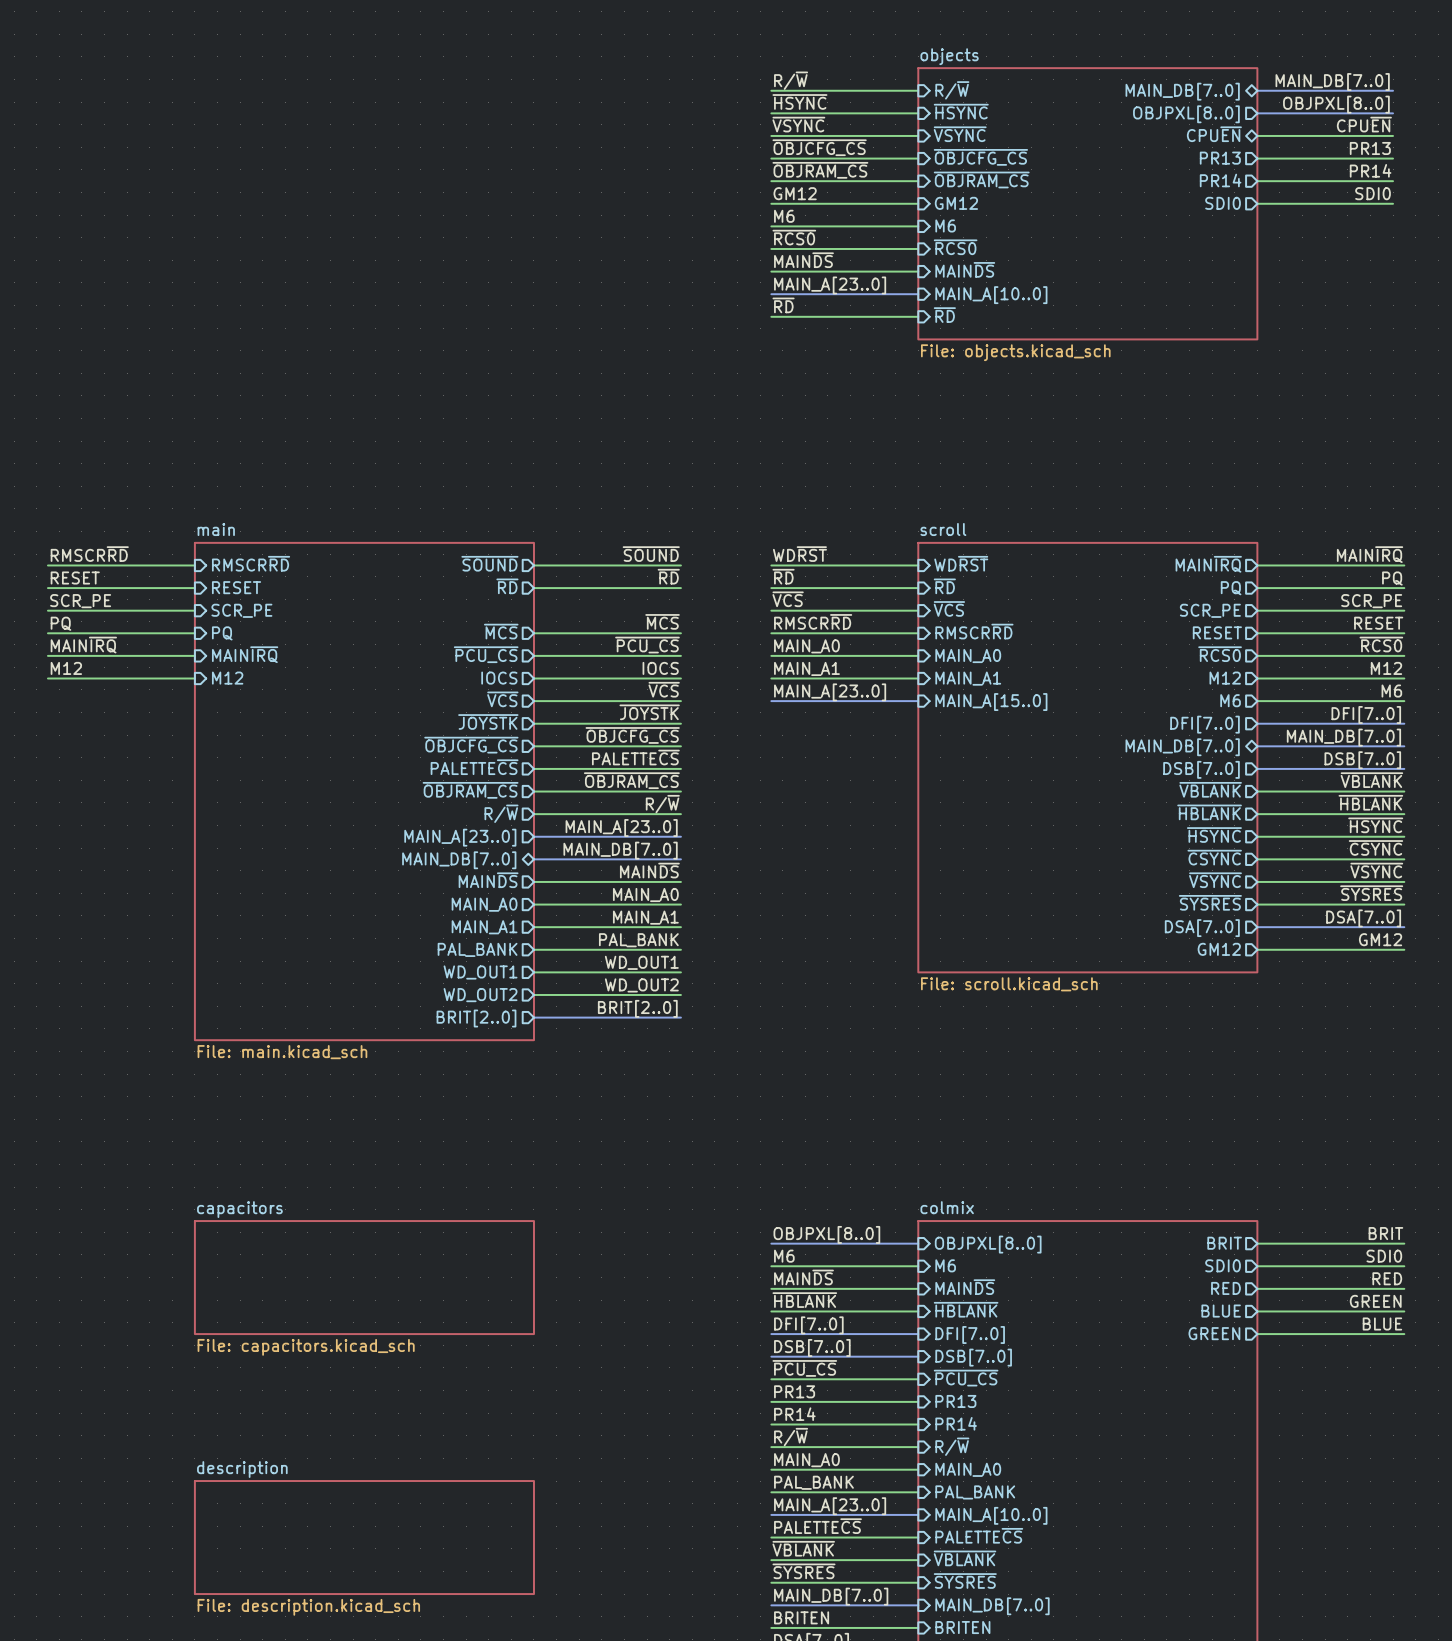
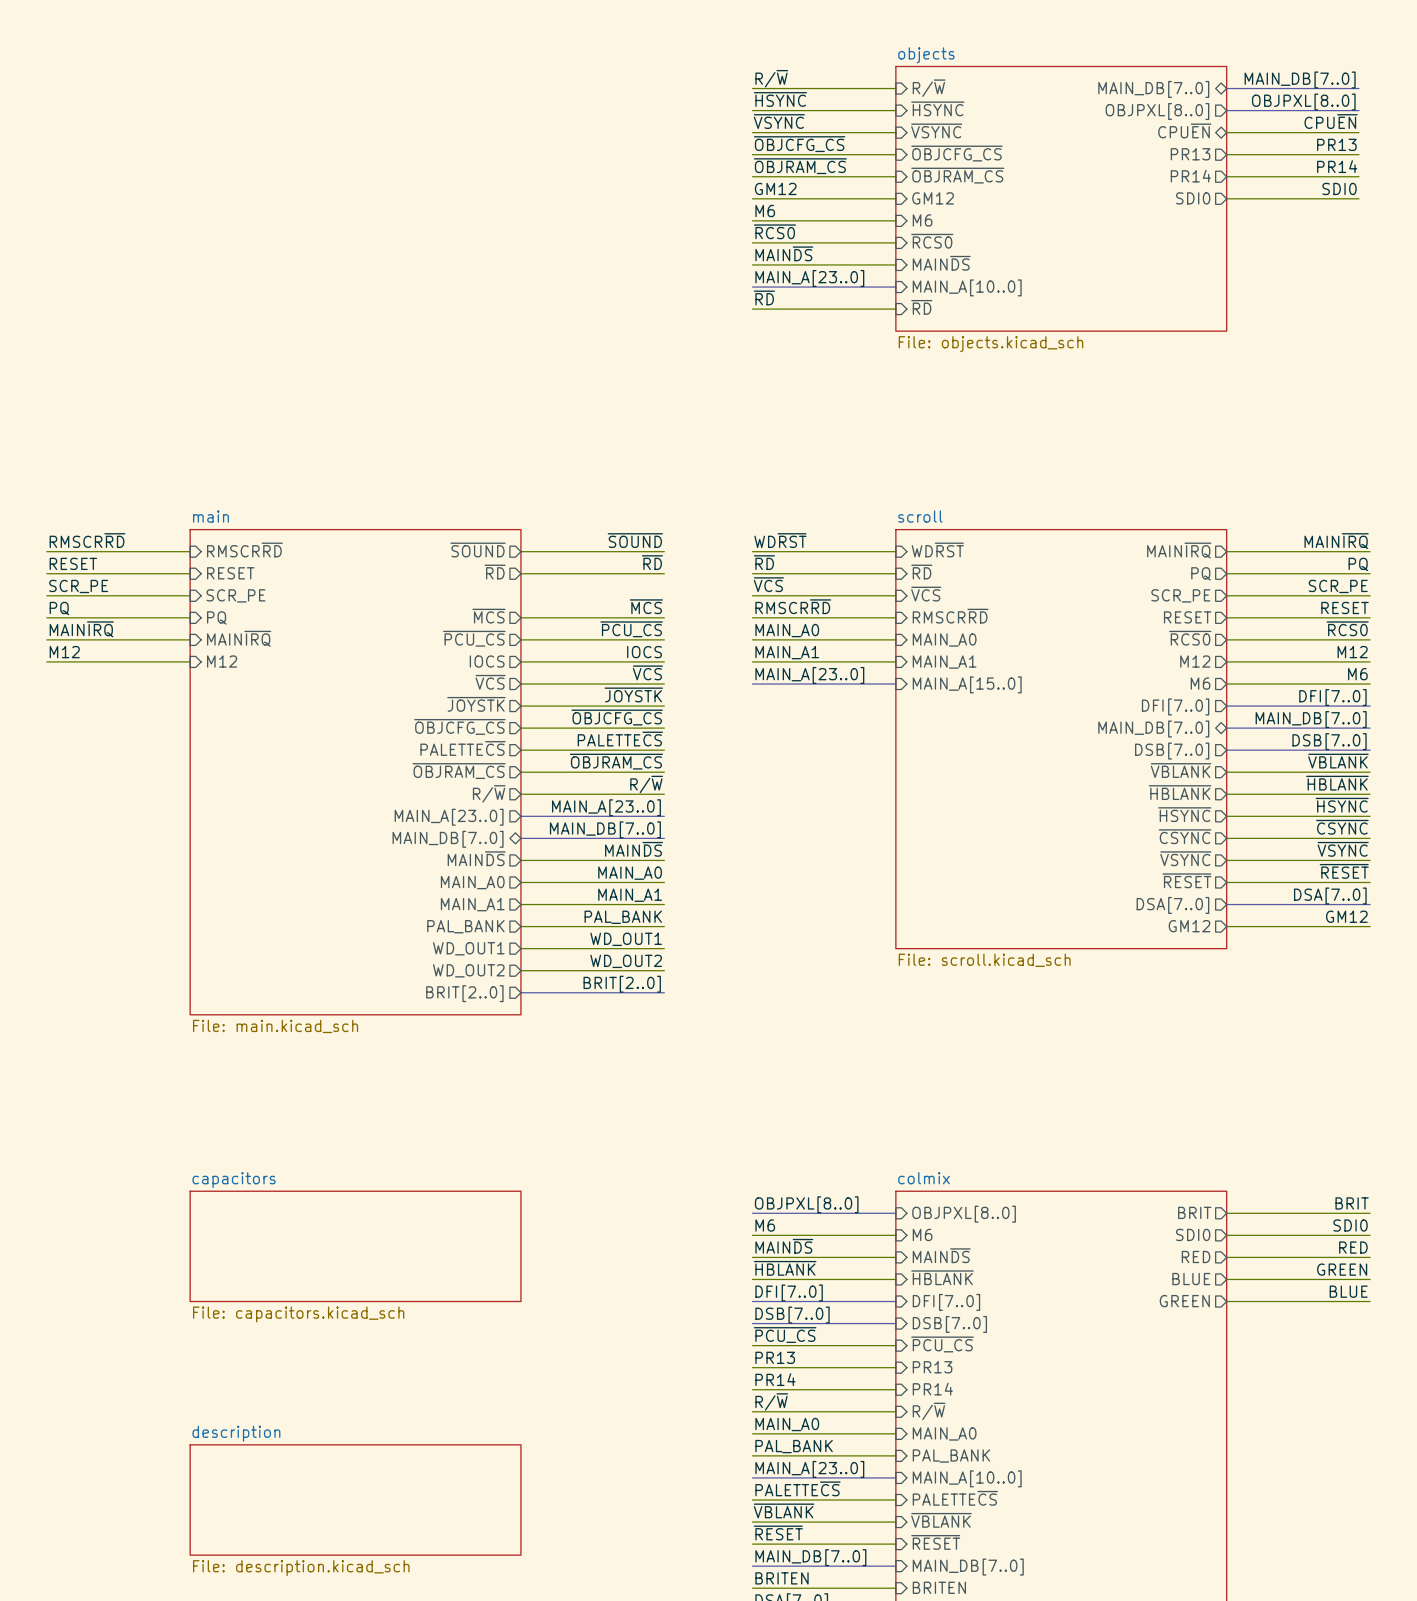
label: ~{SYSRES} (1371, 893) -> ~{RESET} (1344, 871)
sheet pin: ~{SYSRES} (1210, 902) -> ~{RESET} (1186, 880)
label: ~{SYSRES} (804, 1571) -> ~{RESET} (778, 1533)
sheet pin: ~{SYSRES} (965, 1581) -> ~{RESET} (935, 1542)

